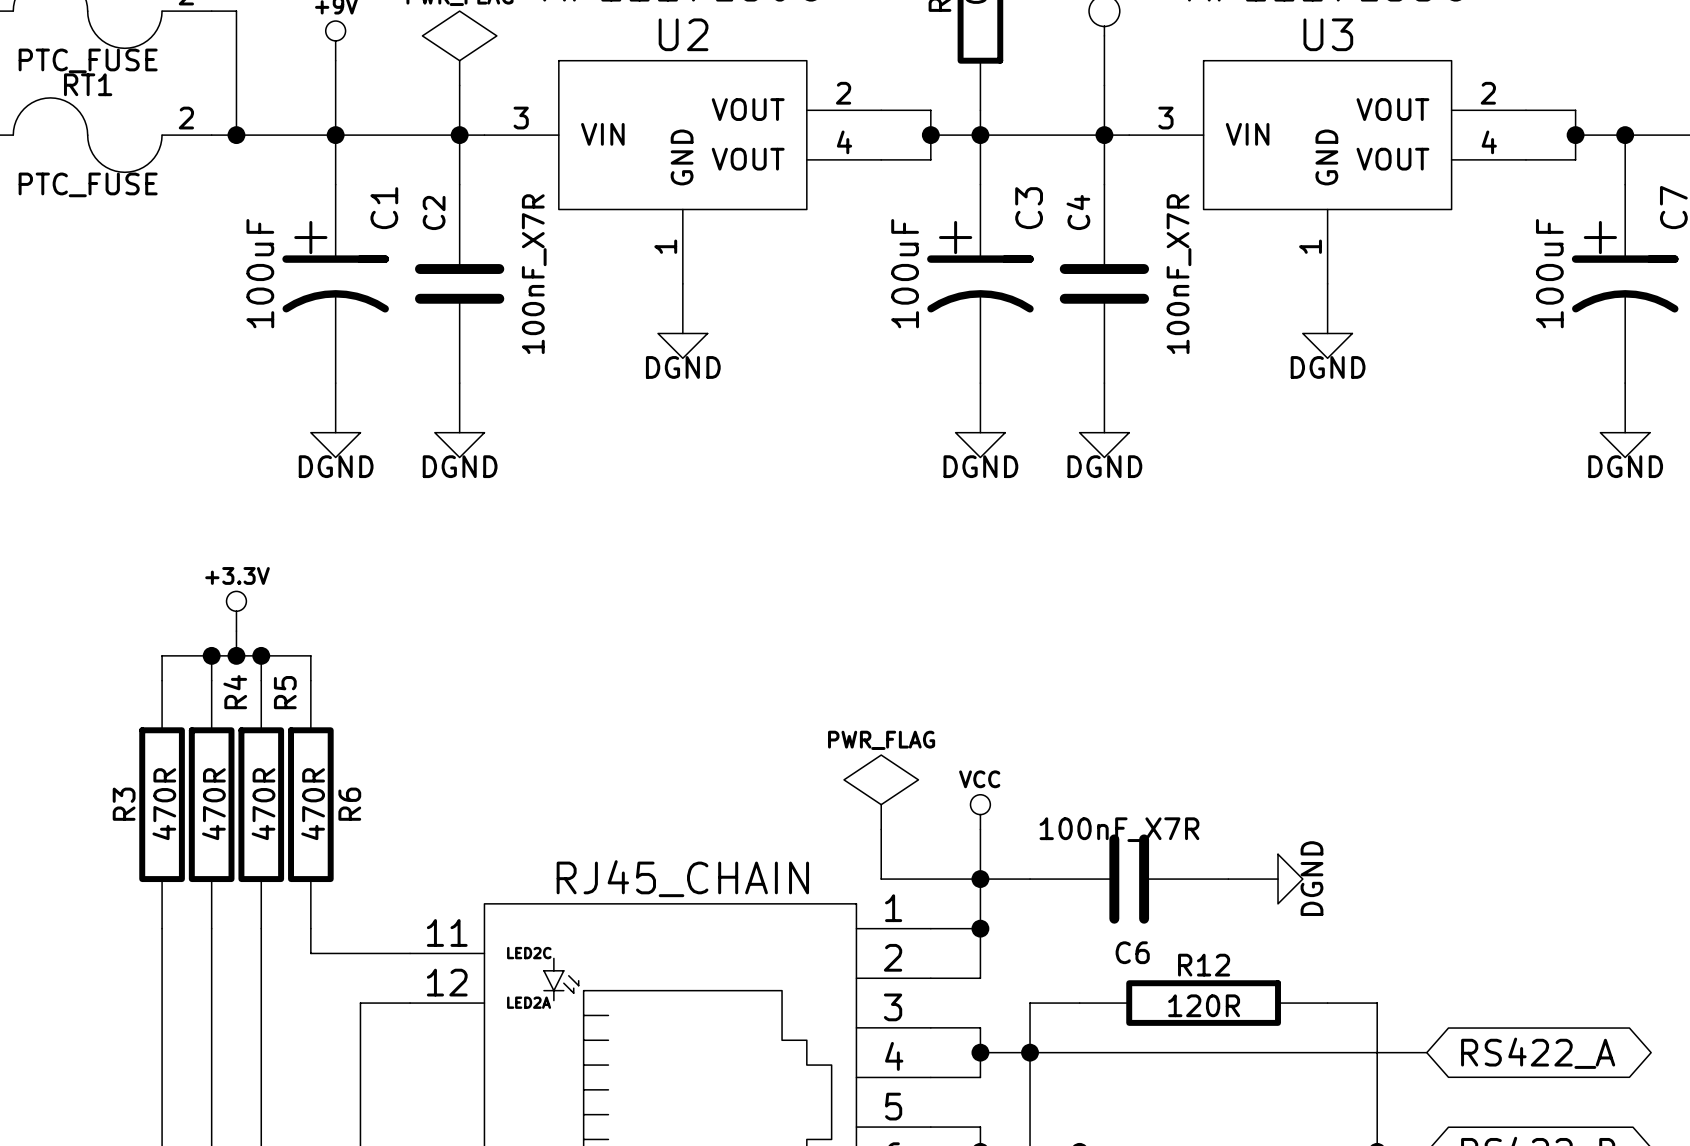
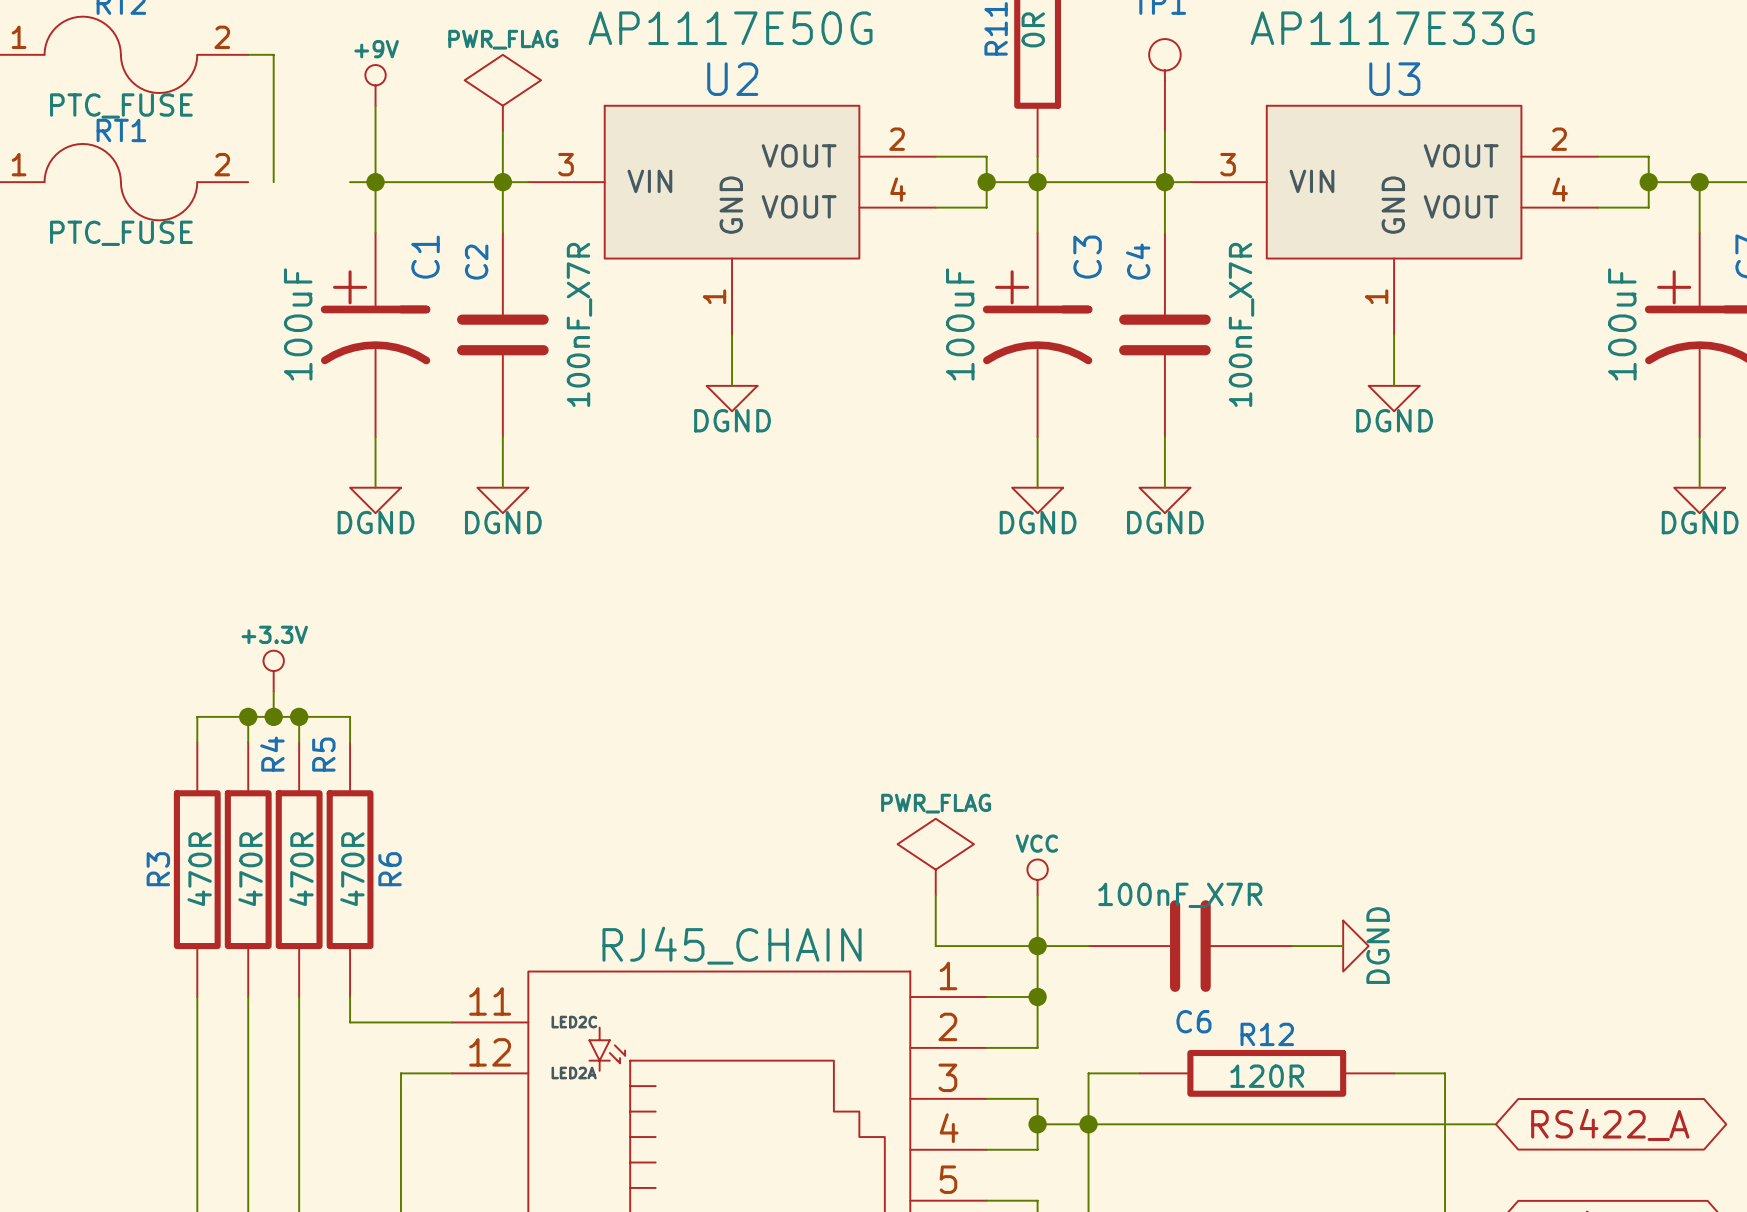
wire: (211, 135) (310, 135) -> none
junction: (236, 135) -> none

